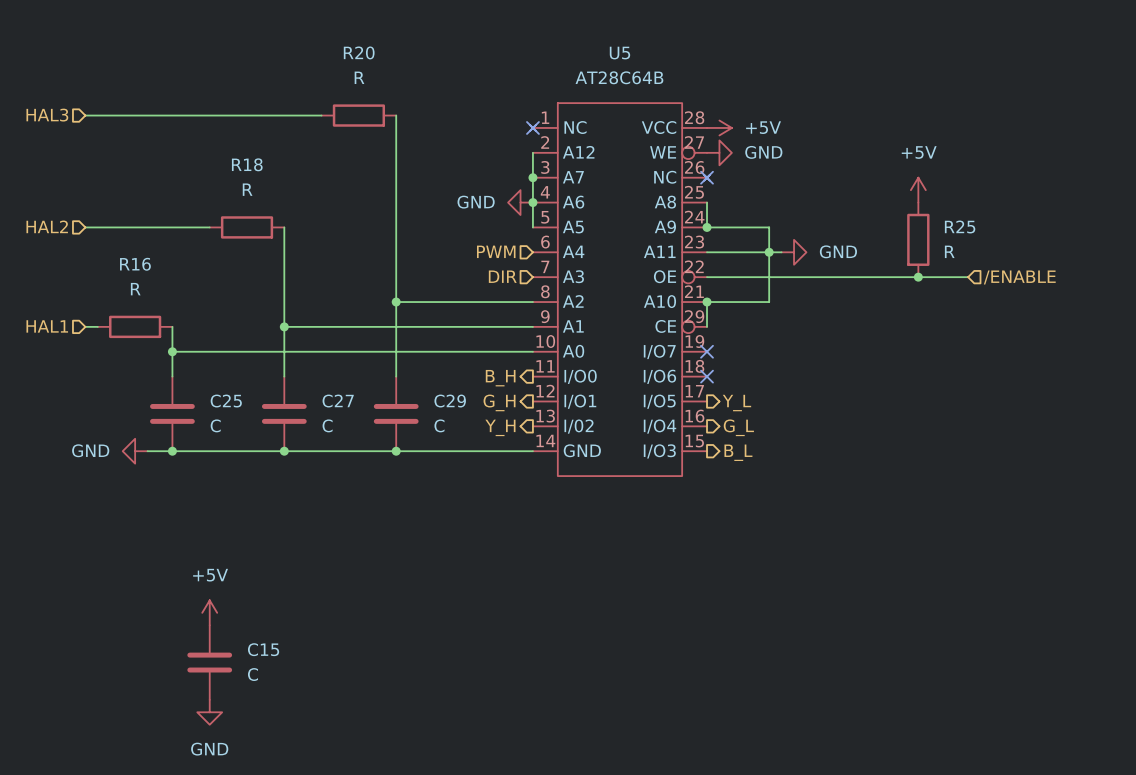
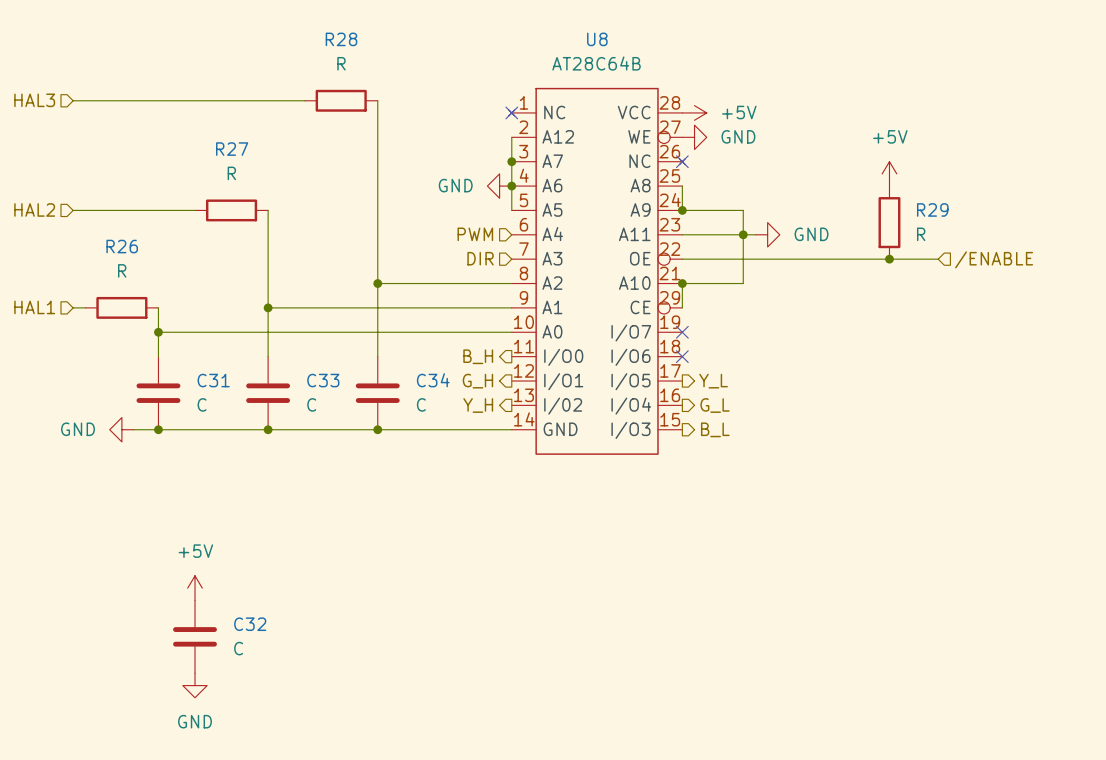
R20 name: R20 (359, 52) -> R28 (341, 39)
U5 name: U5 (619, 53) -> U8 (597, 39)
R18 name: R18 (247, 164) -> R27 (232, 149)
R25 name: R25 (960, 226) -> R29 (932, 209)
R16 name: R16 (135, 264) -> R26 (122, 246)
C25 name: C25 (226, 401) -> C31 (213, 380)
C27 name: C27 (338, 401) -> C33 (323, 380)
C29 name: C29 (450, 401) -> C34 (433, 380)
C15 name: C15 (263, 649) -> C32 (250, 624)

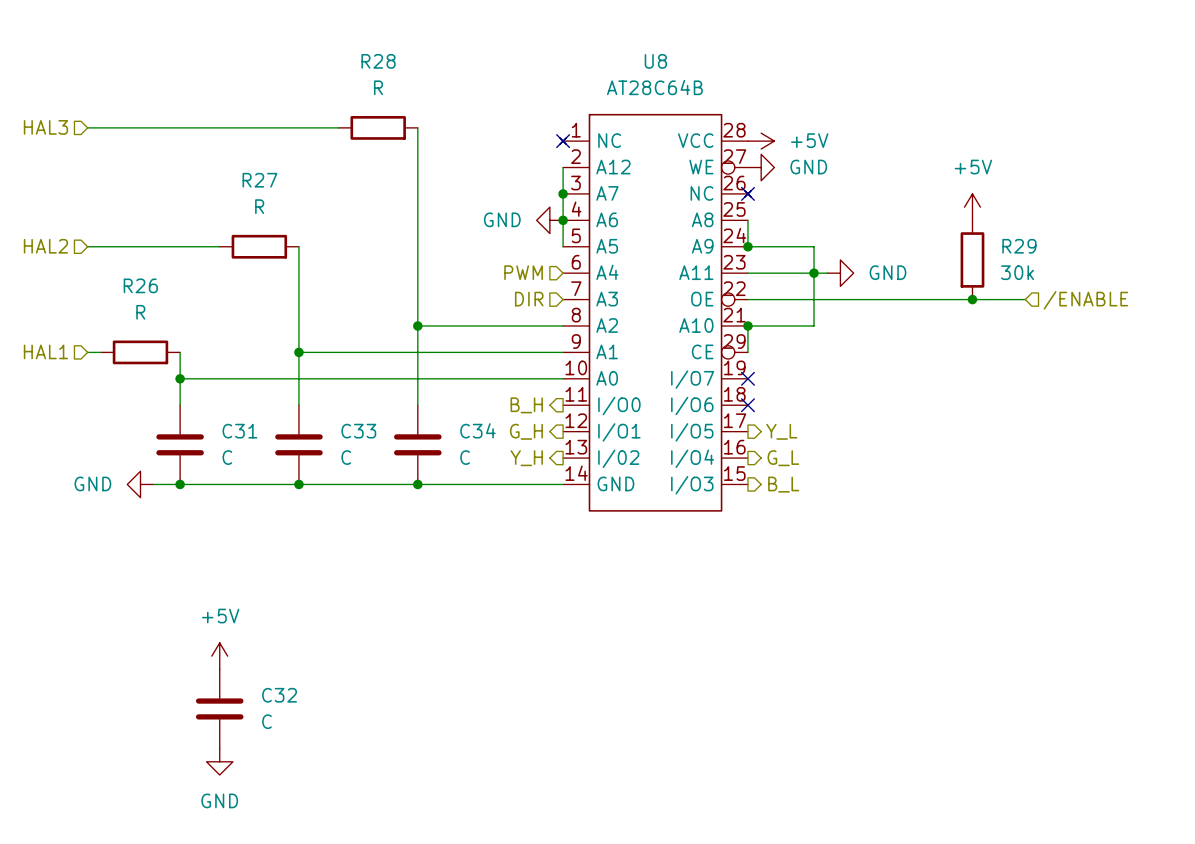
R29 value: R (921, 234) -> 30k (1017, 272)

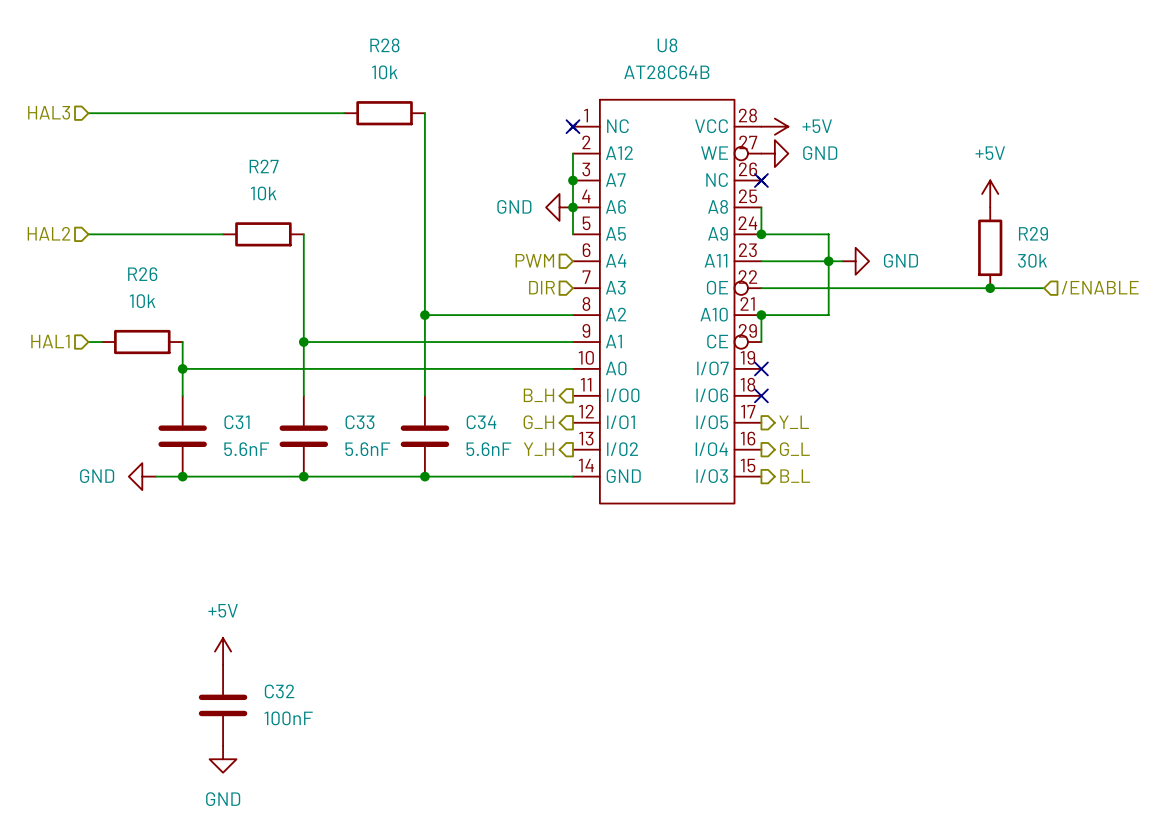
R28 value: R (378, 87) -> 10k (384, 72)
R27 value: R (259, 206) -> 10k (263, 193)
R26 value: R (140, 312) -> 10k (142, 301)
C31 value: C (227, 457) -> 5.6nF (246, 449)
C33 value: C (346, 457) -> 5.6nF (367, 449)
C34 value: C (465, 457) -> 5.6nF (488, 449)
C32 value: C (266, 721) -> 100nF (288, 718)

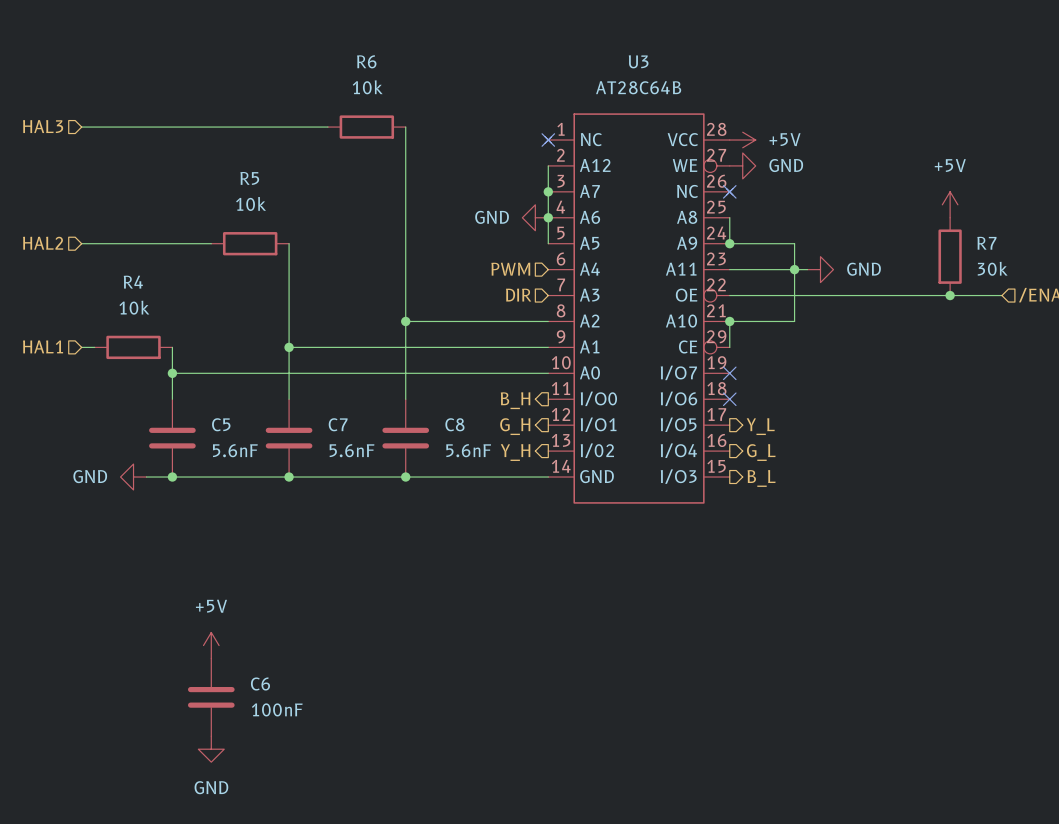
R28 name: R28 (384, 45) -> R6 (366, 61)
U8 name: U8 (667, 45) -> U3 (638, 61)
R27 name: R27 (264, 166) -> R5 (249, 178)
R29 name: R29 (1033, 233) -> R7 (986, 243)
R26 name: R26 (142, 274) -> R4 (133, 282)
C31 name: C31 (237, 422) -> C5 (221, 424)
C33 name: C33 (359, 422) -> C7 (338, 424)
C34 name: C34 (481, 422) -> C8 (454, 424)
C32 name: C32 (279, 691) -> C6 (260, 683)

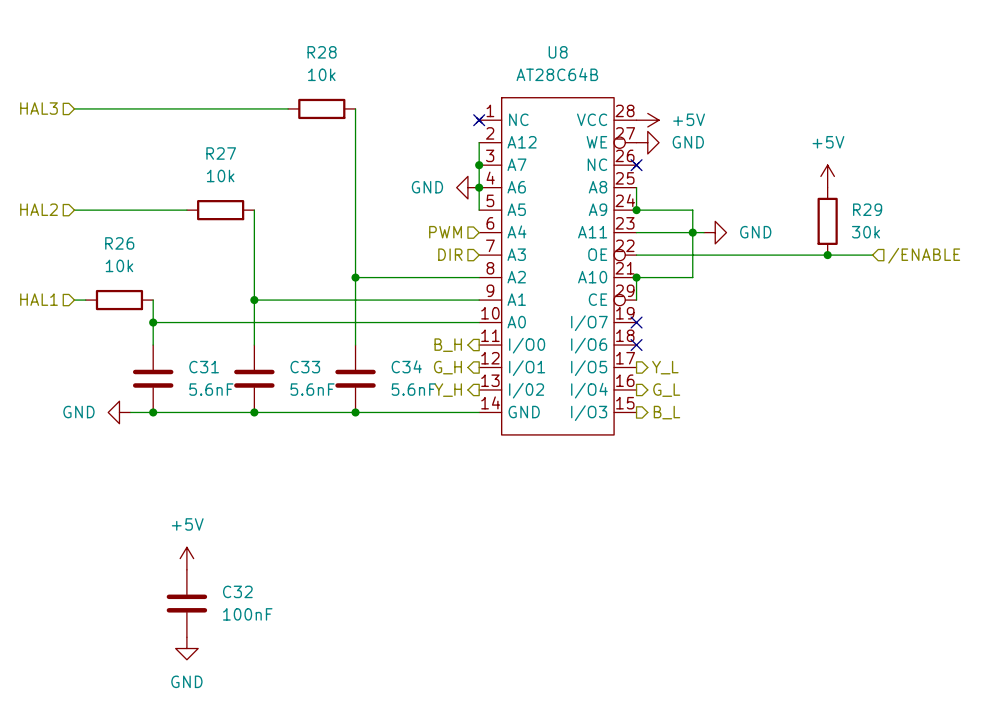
R6 name: R6 (366, 61) -> R28 (322, 52)
U3 name: U3 (638, 61) -> U8 (558, 52)
R5 name: R5 (249, 178) -> R27 (221, 153)
R7 name: R7 (986, 243) -> R29 (867, 209)
R4 name: R4 (133, 282) -> R26 (119, 243)
C5 name: C5 (221, 424) -> C31 (204, 367)
C7 name: C7 (338, 424) -> C33 (305, 367)
C8 name: C8 (454, 424) -> C34 (406, 366)
C6 name: C6 (260, 683) -> C32 (237, 591)

